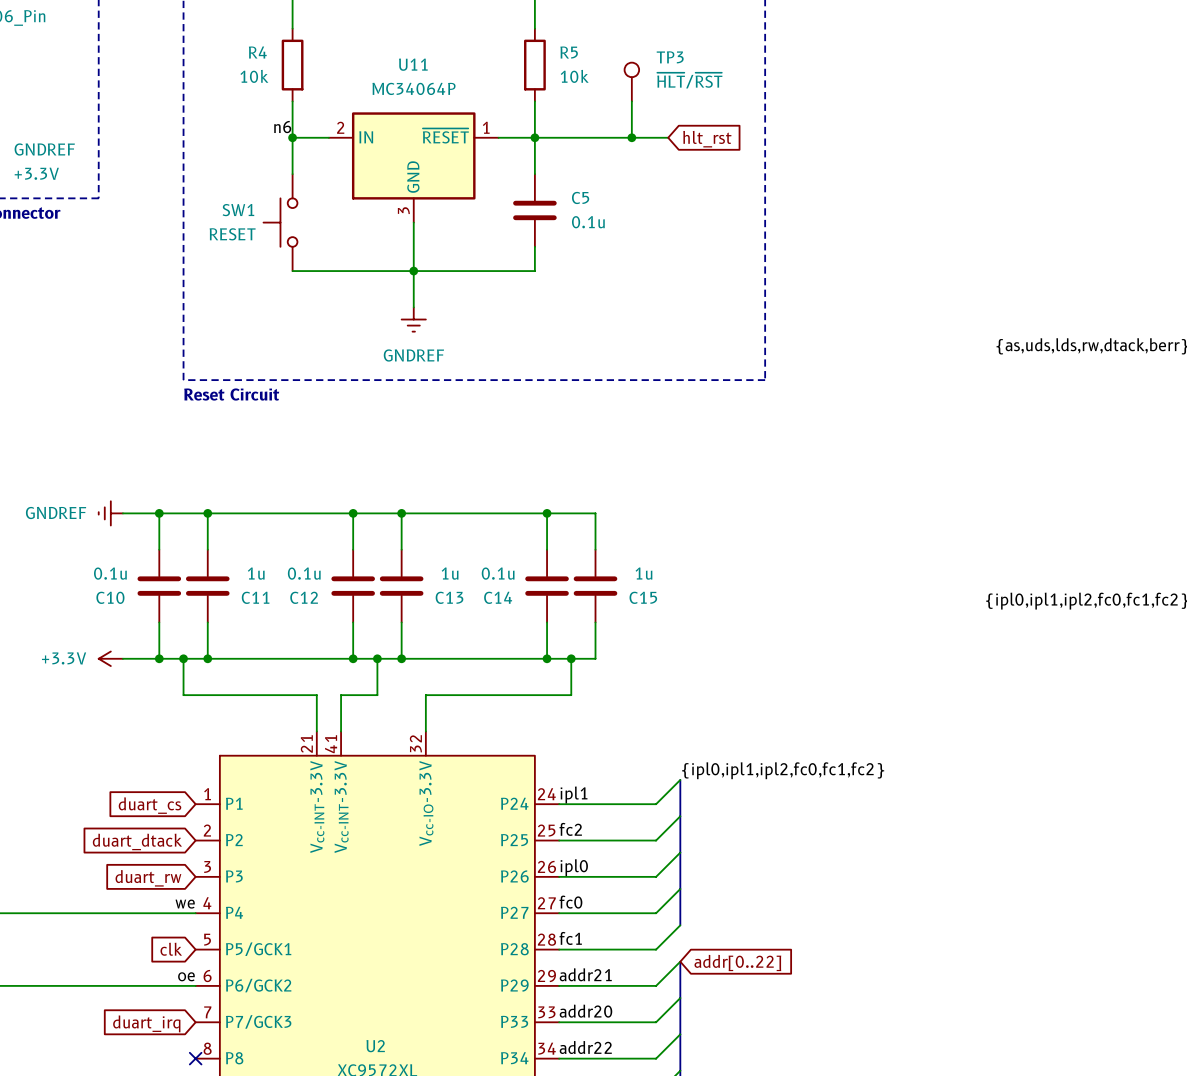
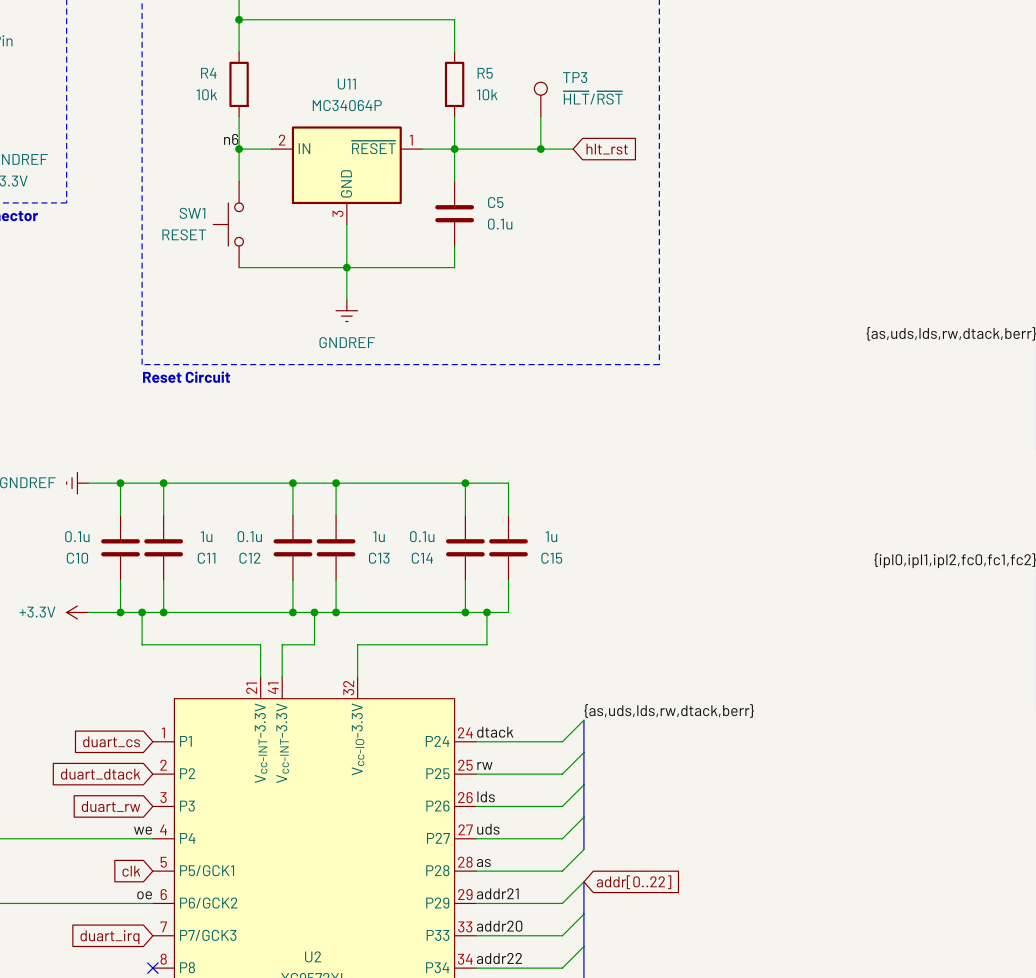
label: {ipl0,ipl1,ipl2,fc0,fc1,fc2} (783, 770) -> {as,uds,lds,rw,dtack,berr} (669, 710)
label: ipl1 (574, 794) -> dtack (495, 732)
label: fc2 (570, 829) -> rw (484, 765)
label: ipl0 (574, 867) -> lds (486, 796)
label: fc0 (570, 902) -> uds (488, 829)
label: fc1 (570, 938) -> as (483, 862)

